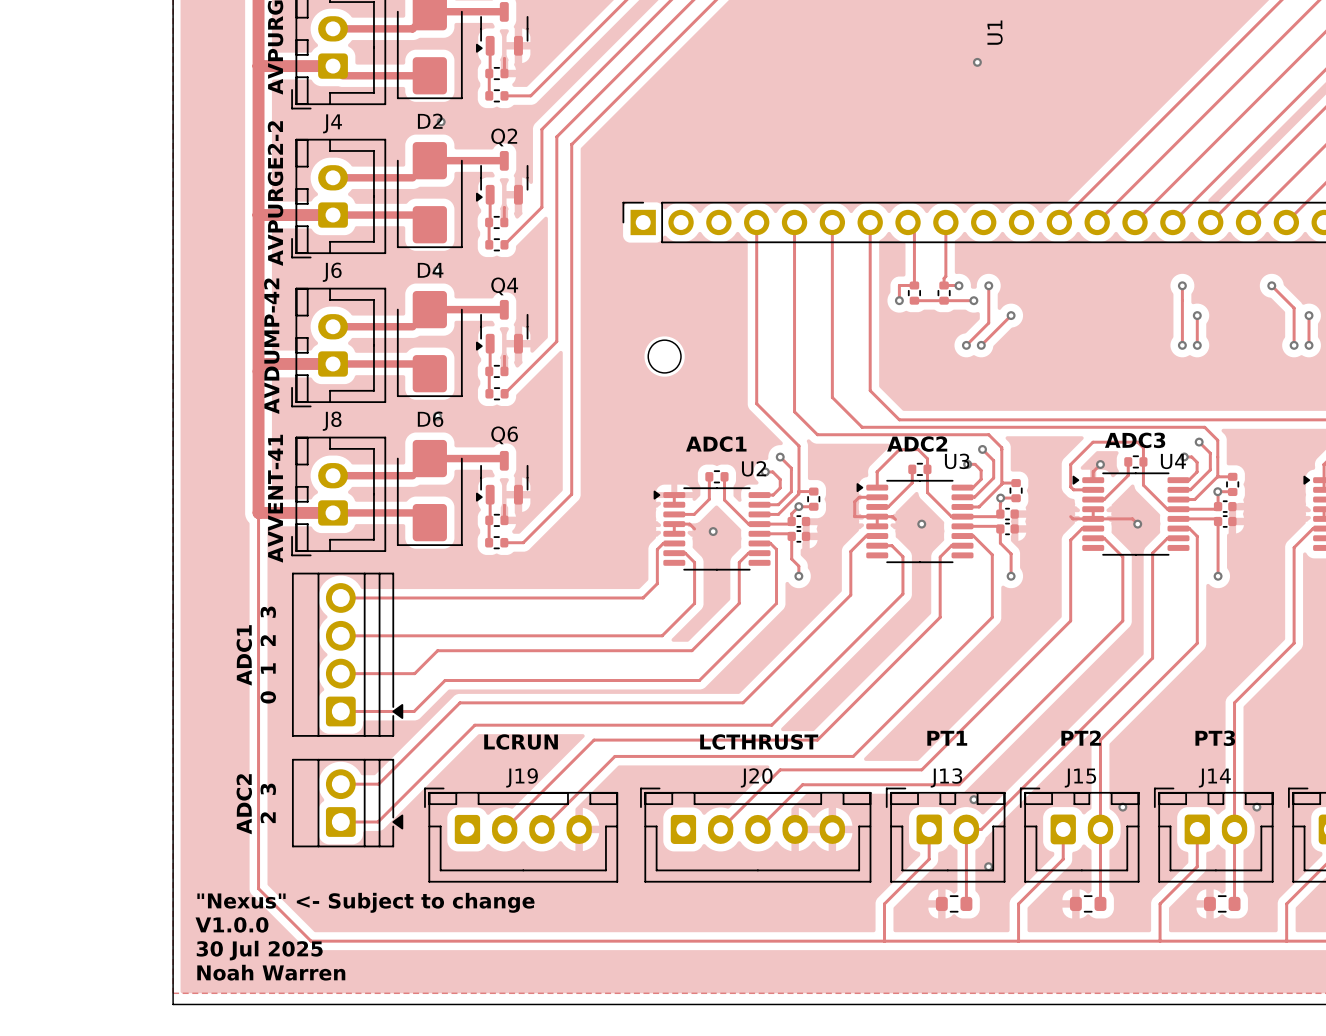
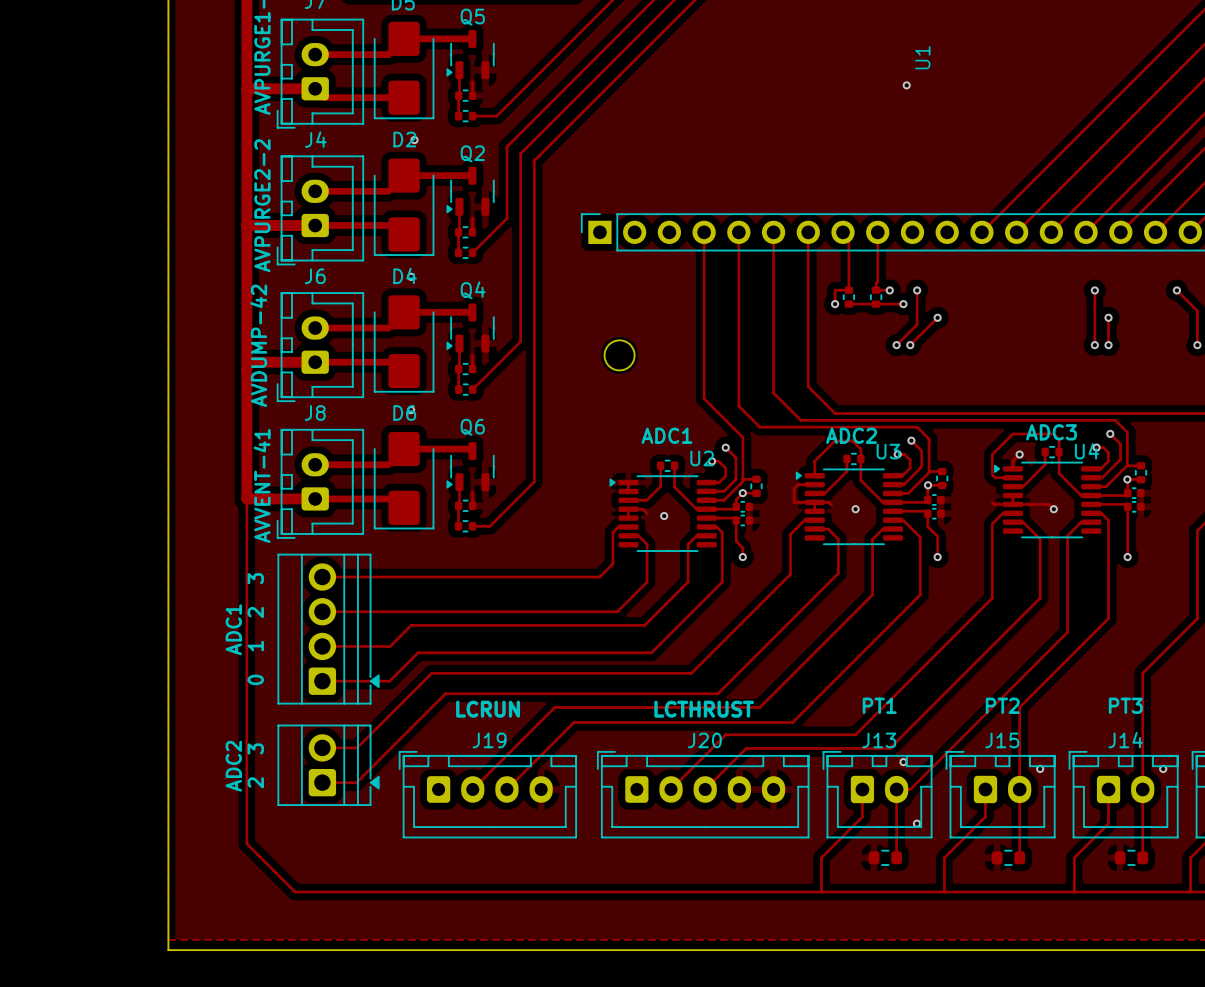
text: "Nexus" <- Subject to change (365, 902) -> none
text: V1.0.0 (231, 924) -> none
text: 30 Jul 2025 (259, 950) -> none
text: Noah Warren (271, 972) -> none

